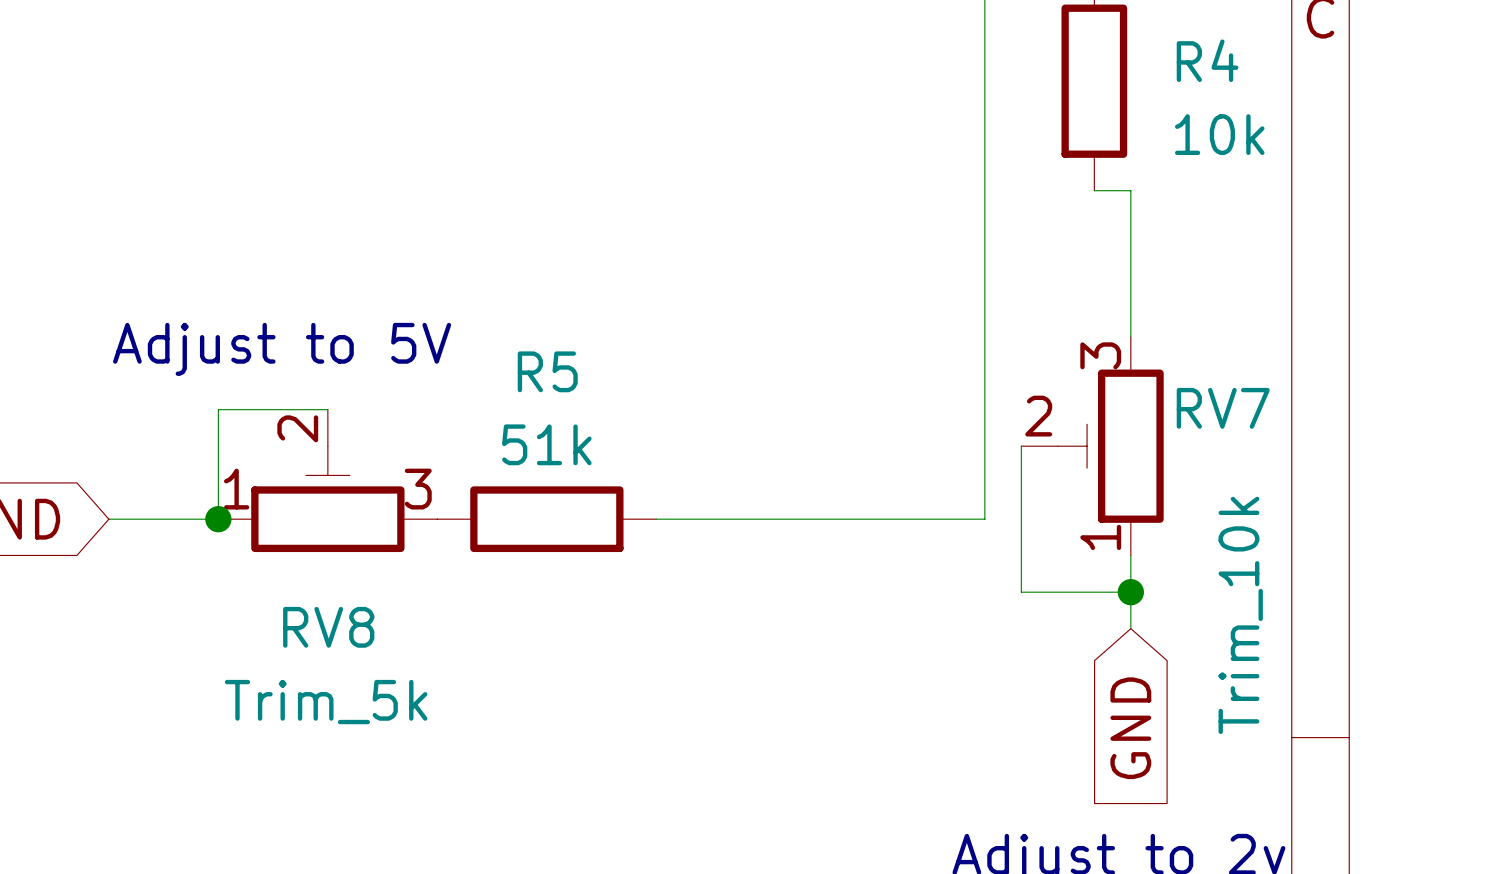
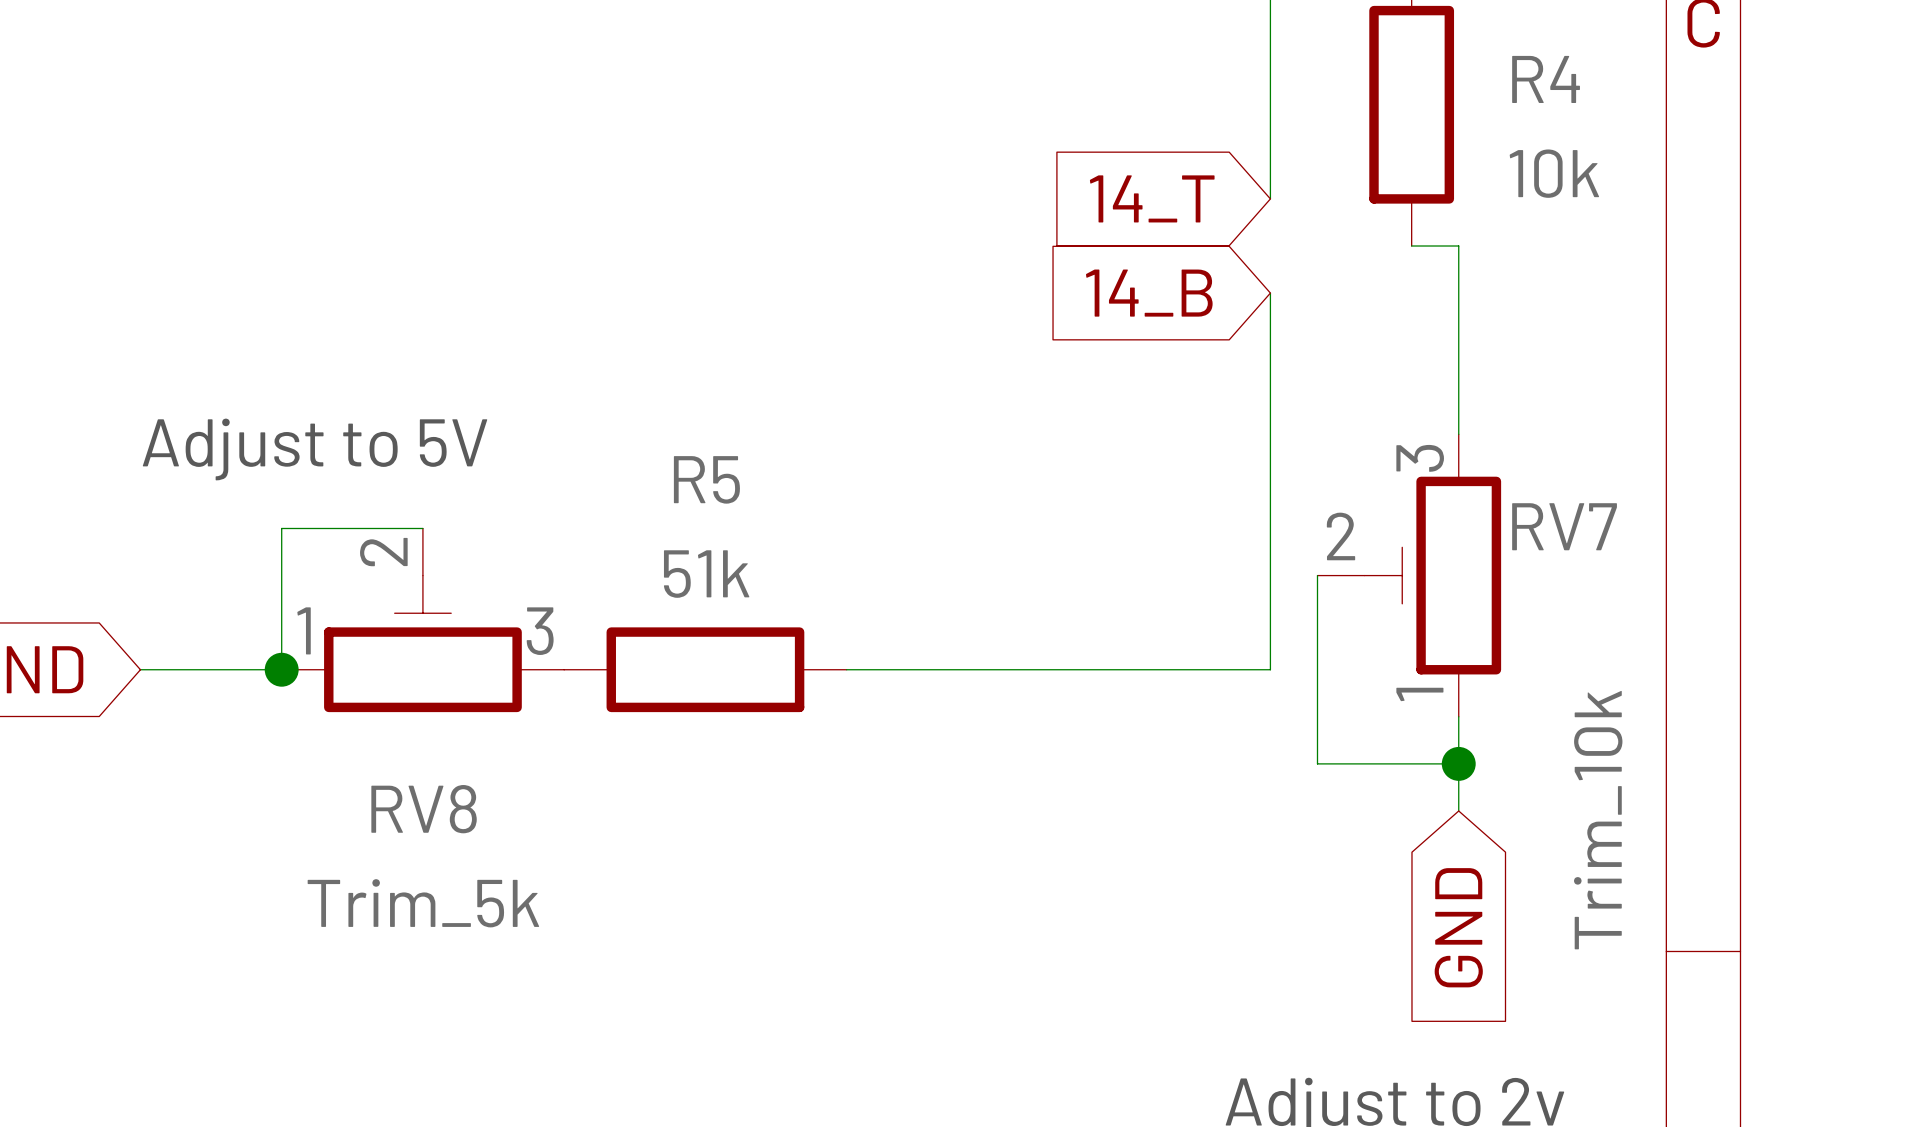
wire: (984, 154) (984, 227) -> none
global label: none -> 14_T (1152, 198)
global label: none -> 14_B (1149, 293)

